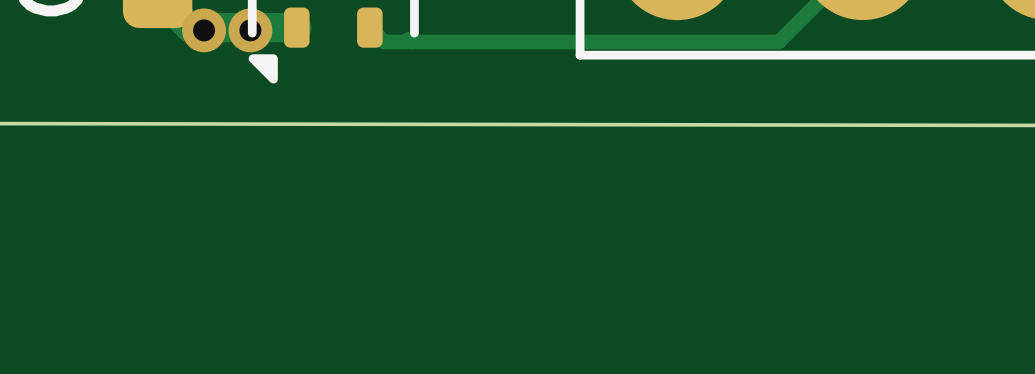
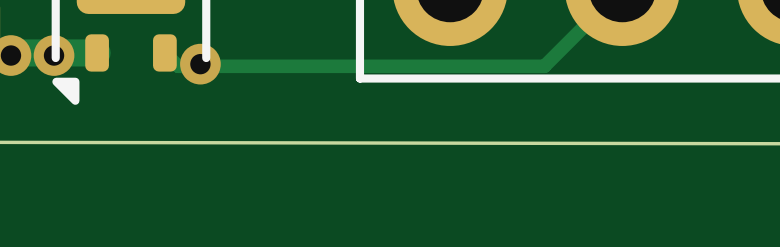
via: none -> (200, 64)

